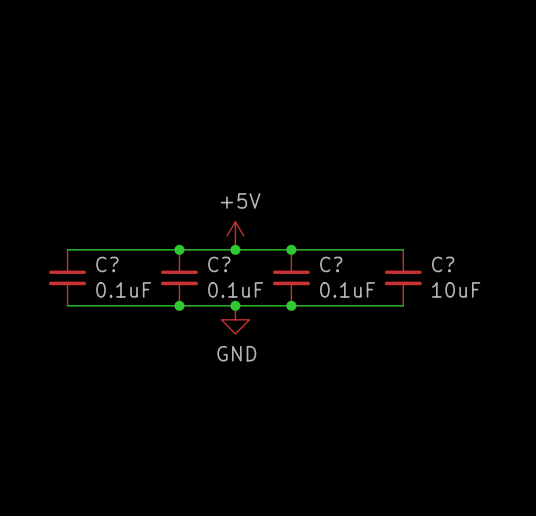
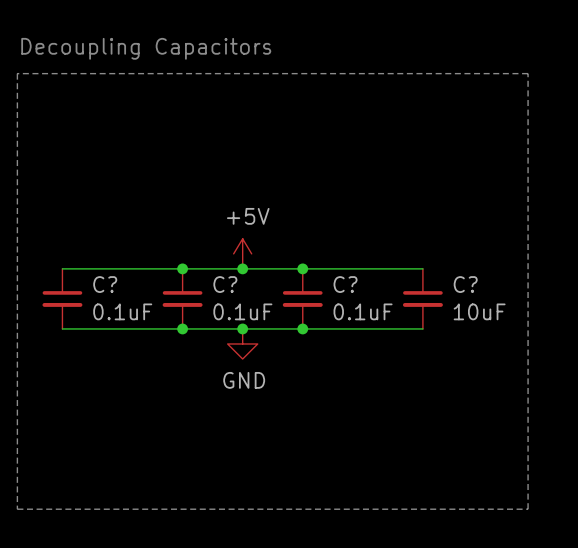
text: none -> Decoupling Capacitors (146, 48)
line: none -> (17, 73) (17, 509) (528, 509) (528, 73) (17, 73)

